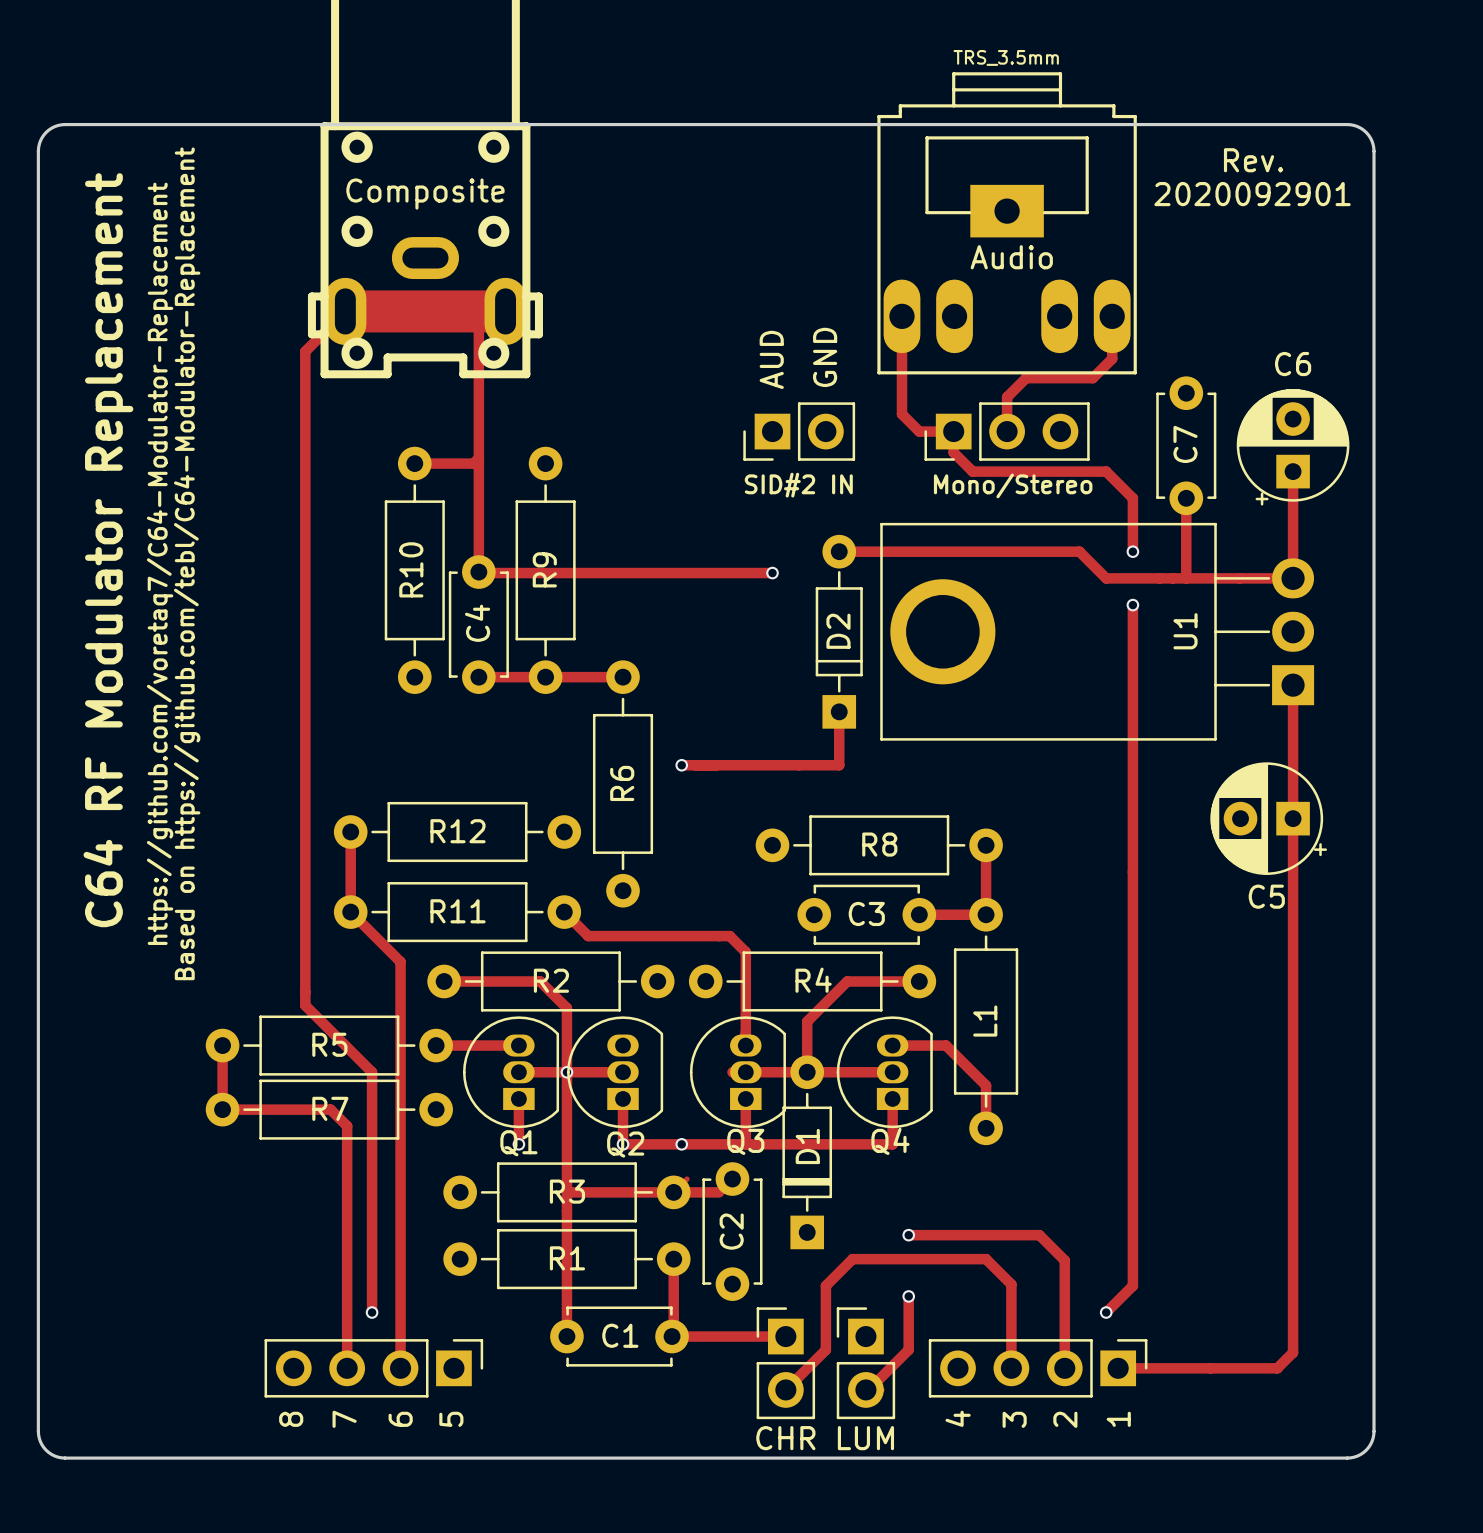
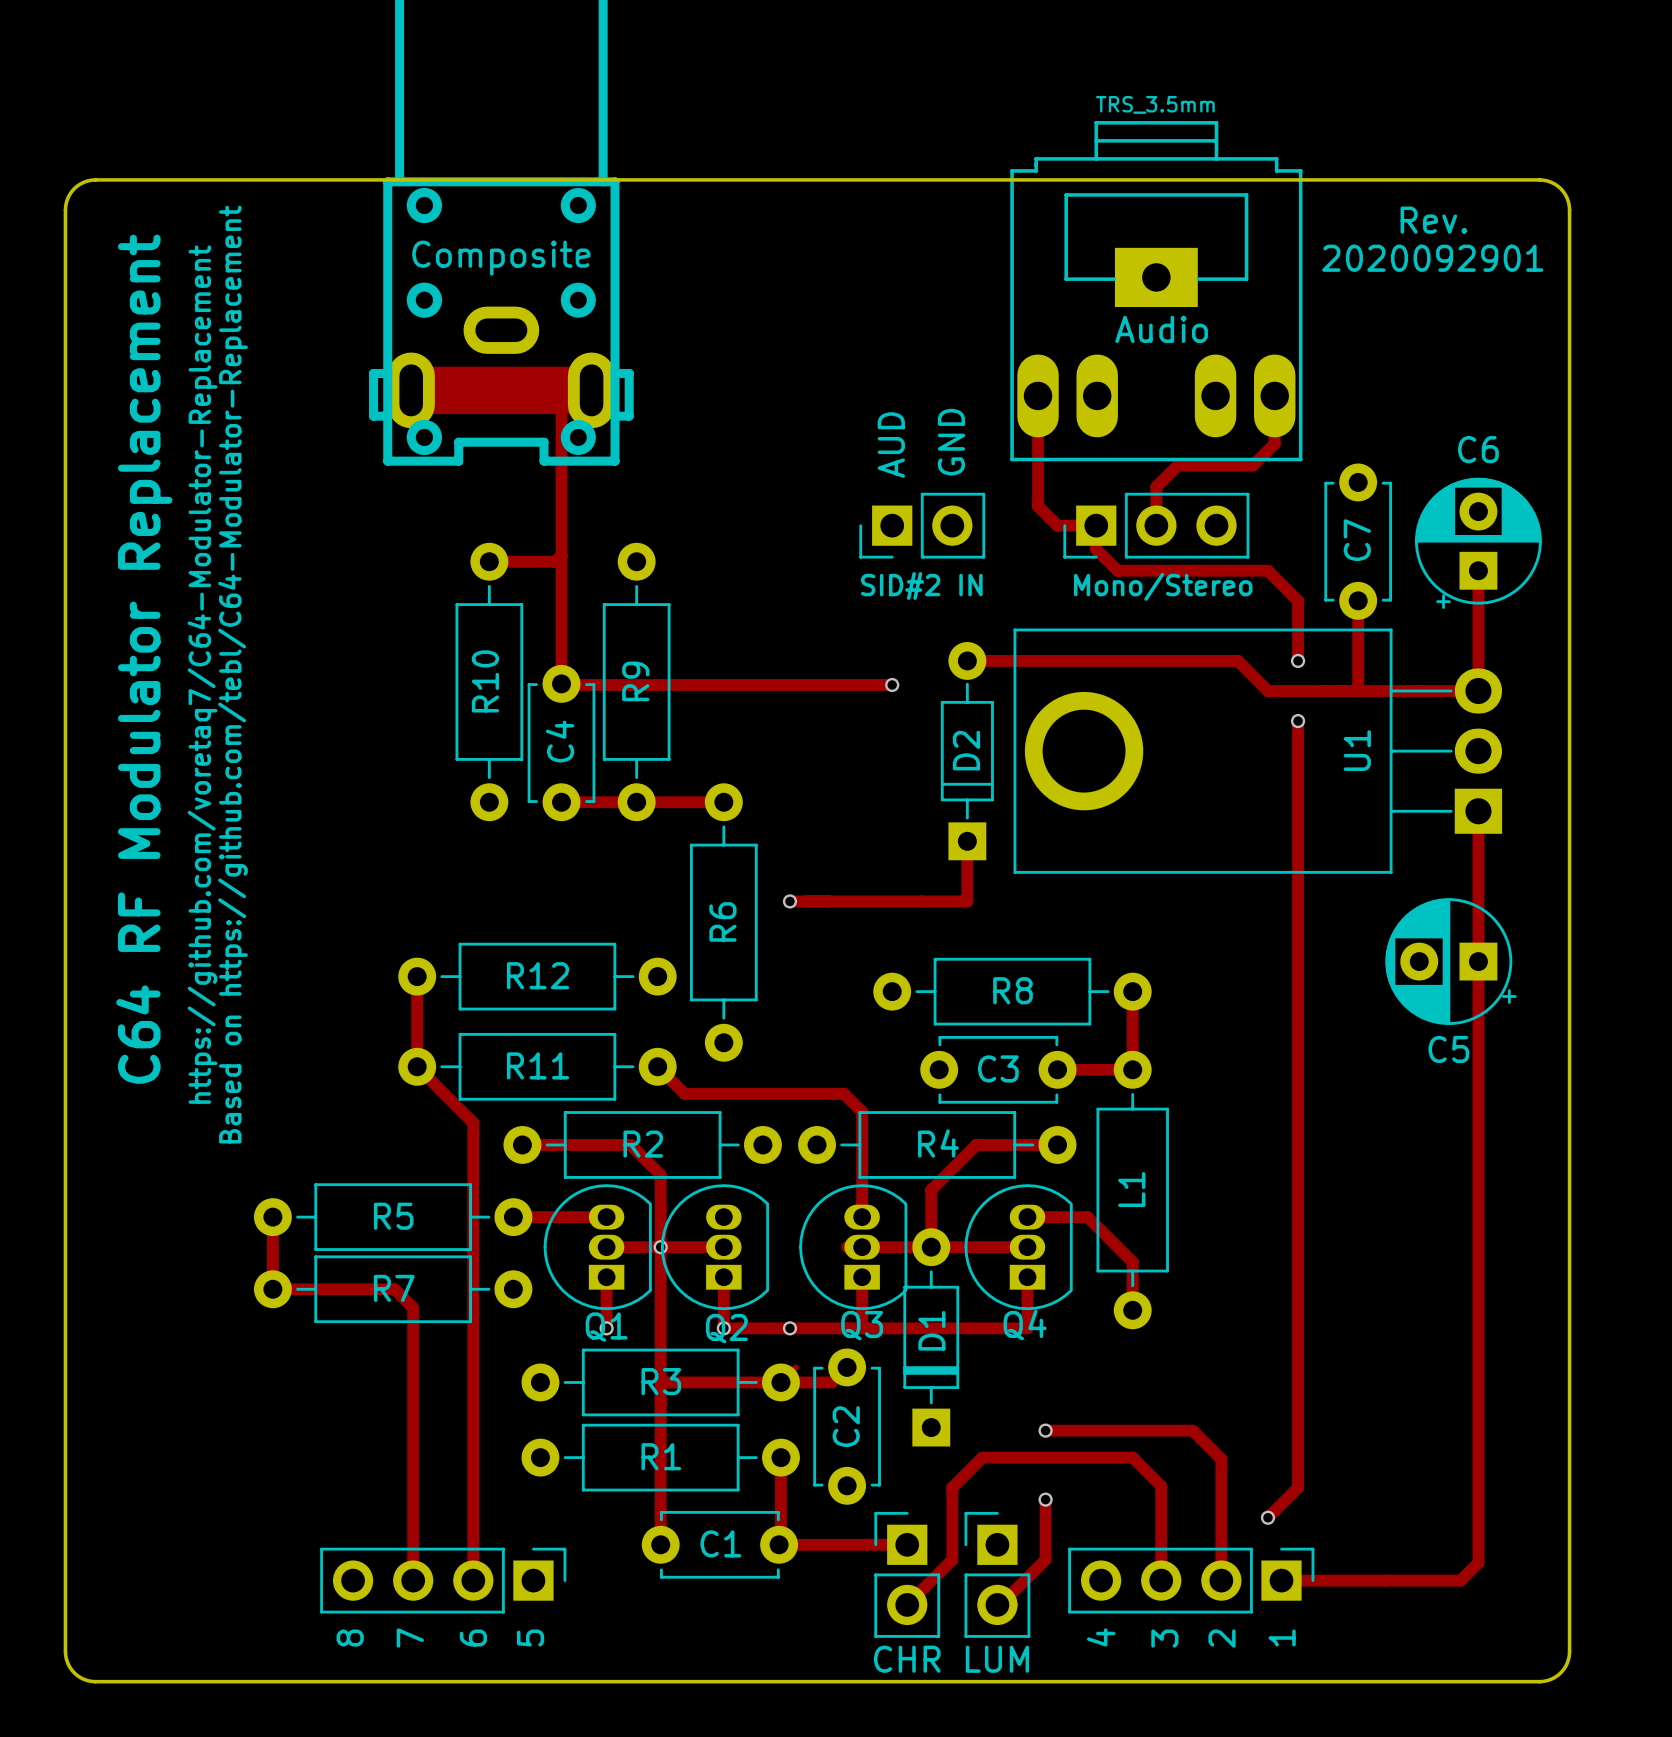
track: (345, 311) (305, 351) (305, 1005) (372, 1072) (372, 1312) -> none
via: (372, 1312) -> none

